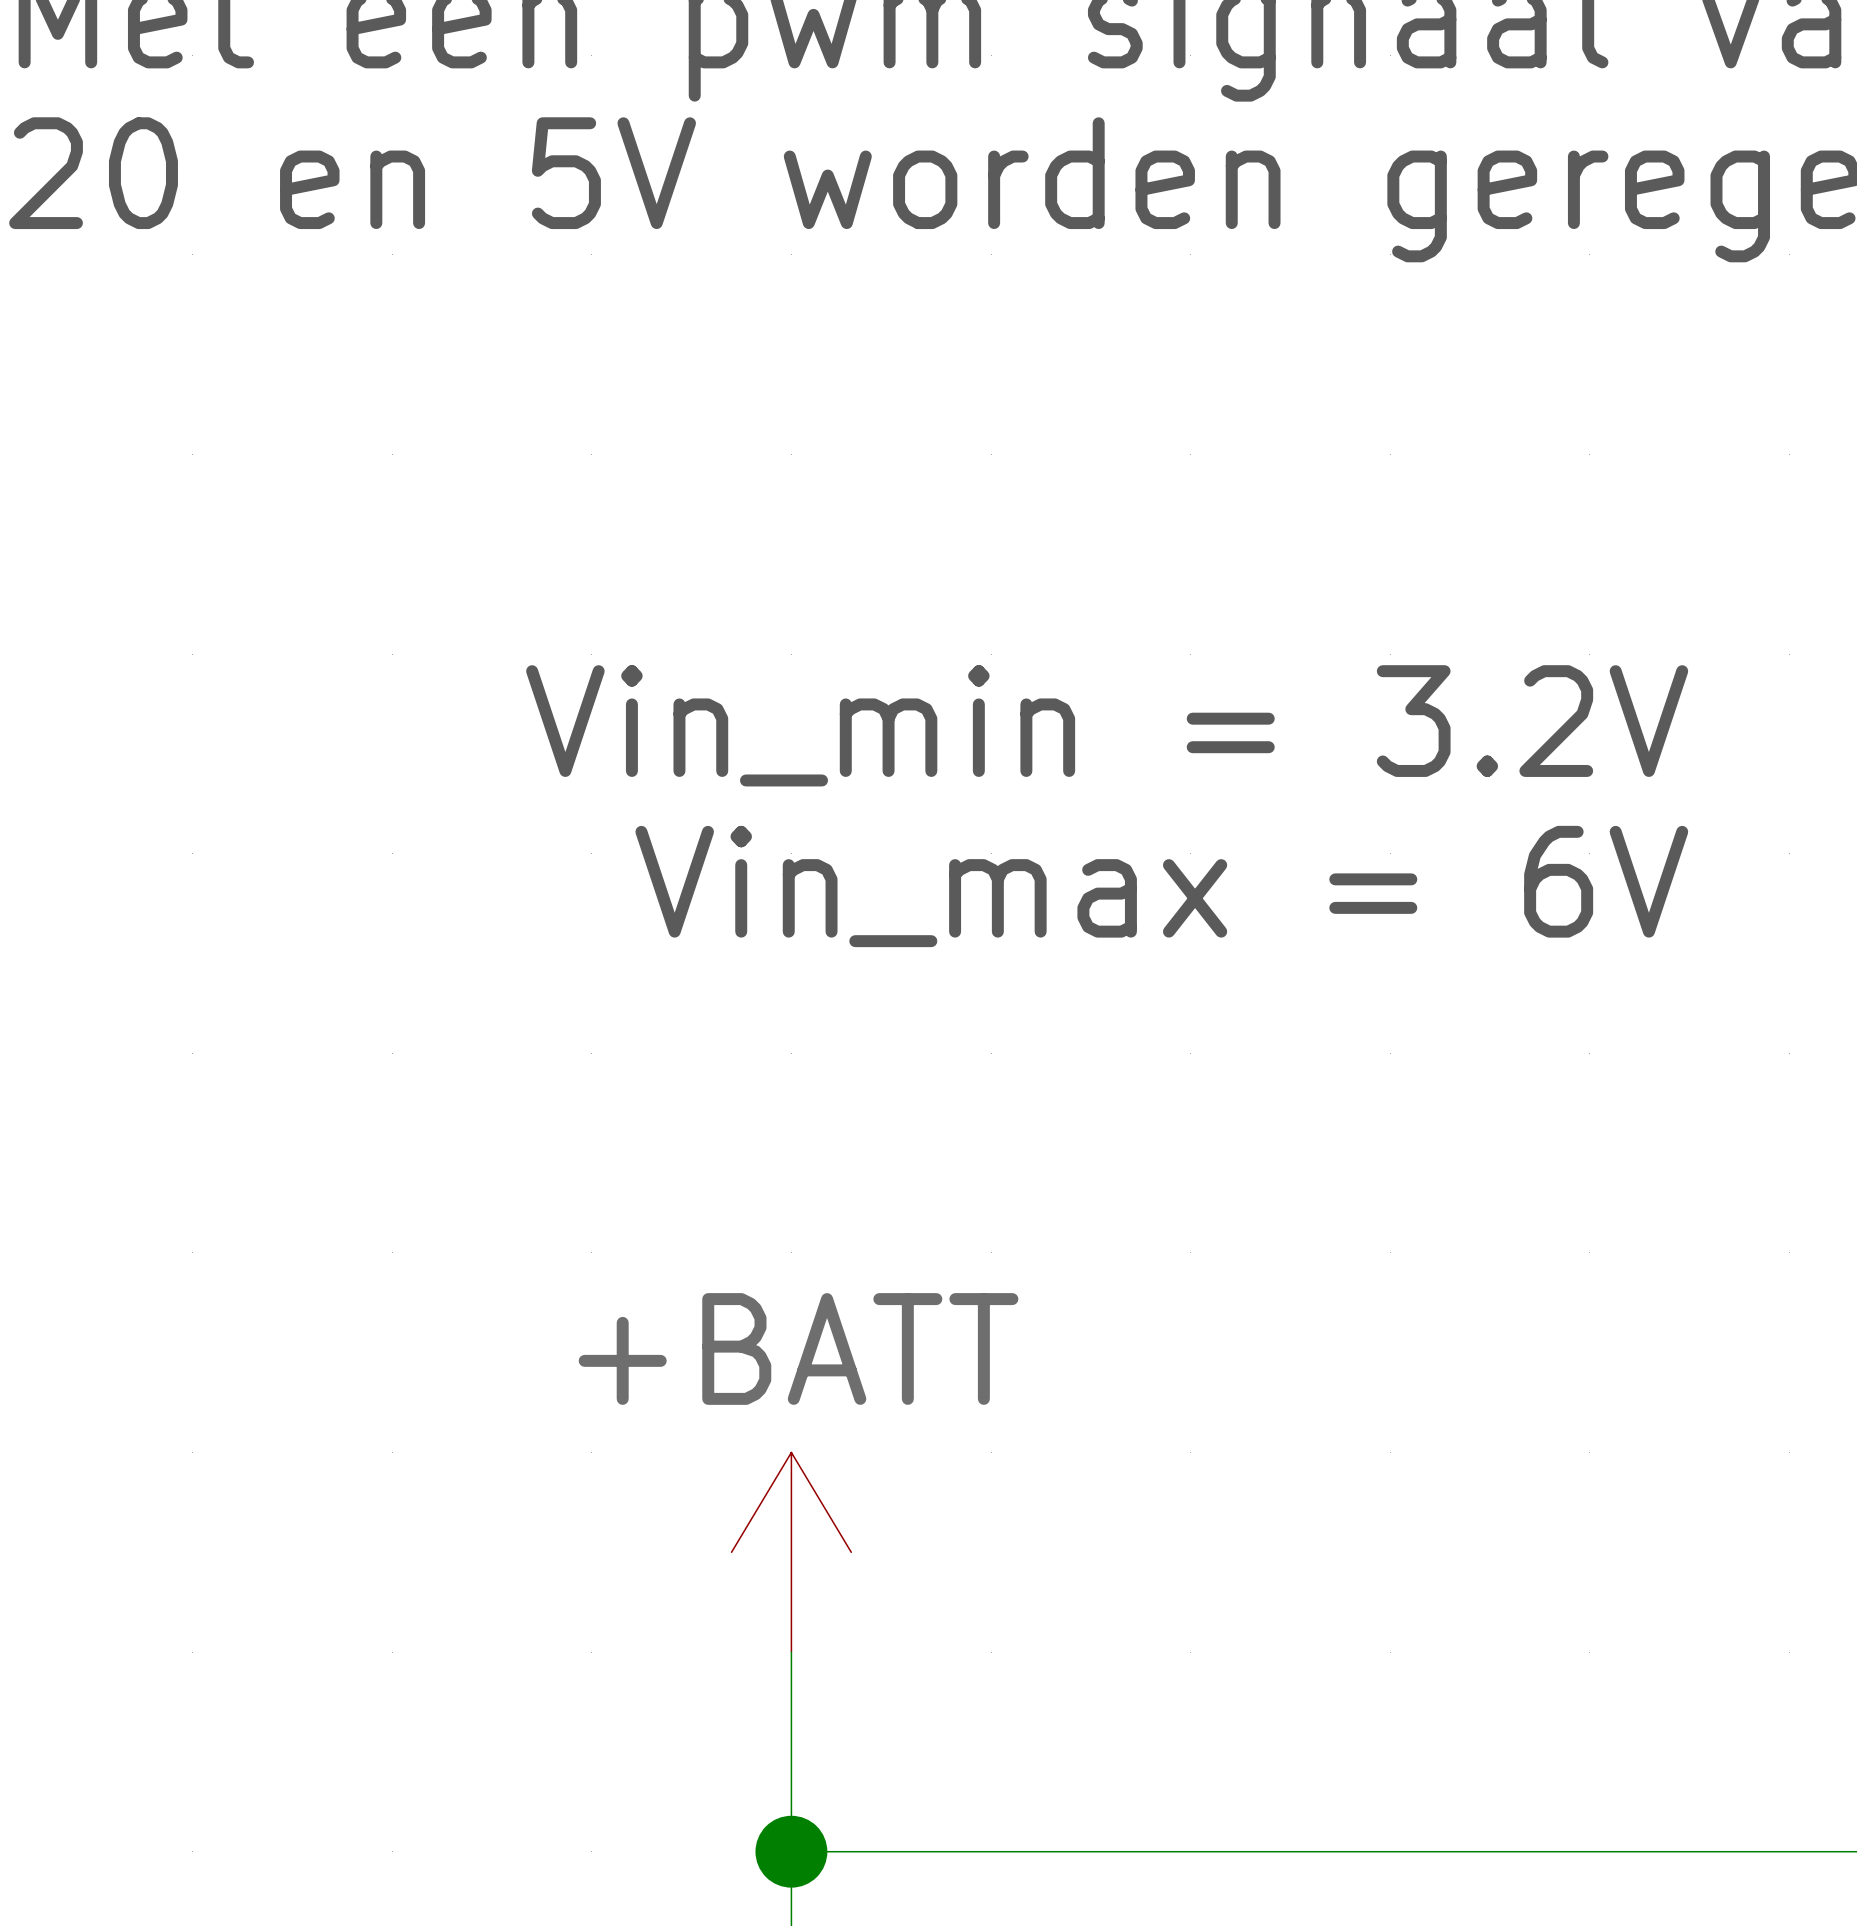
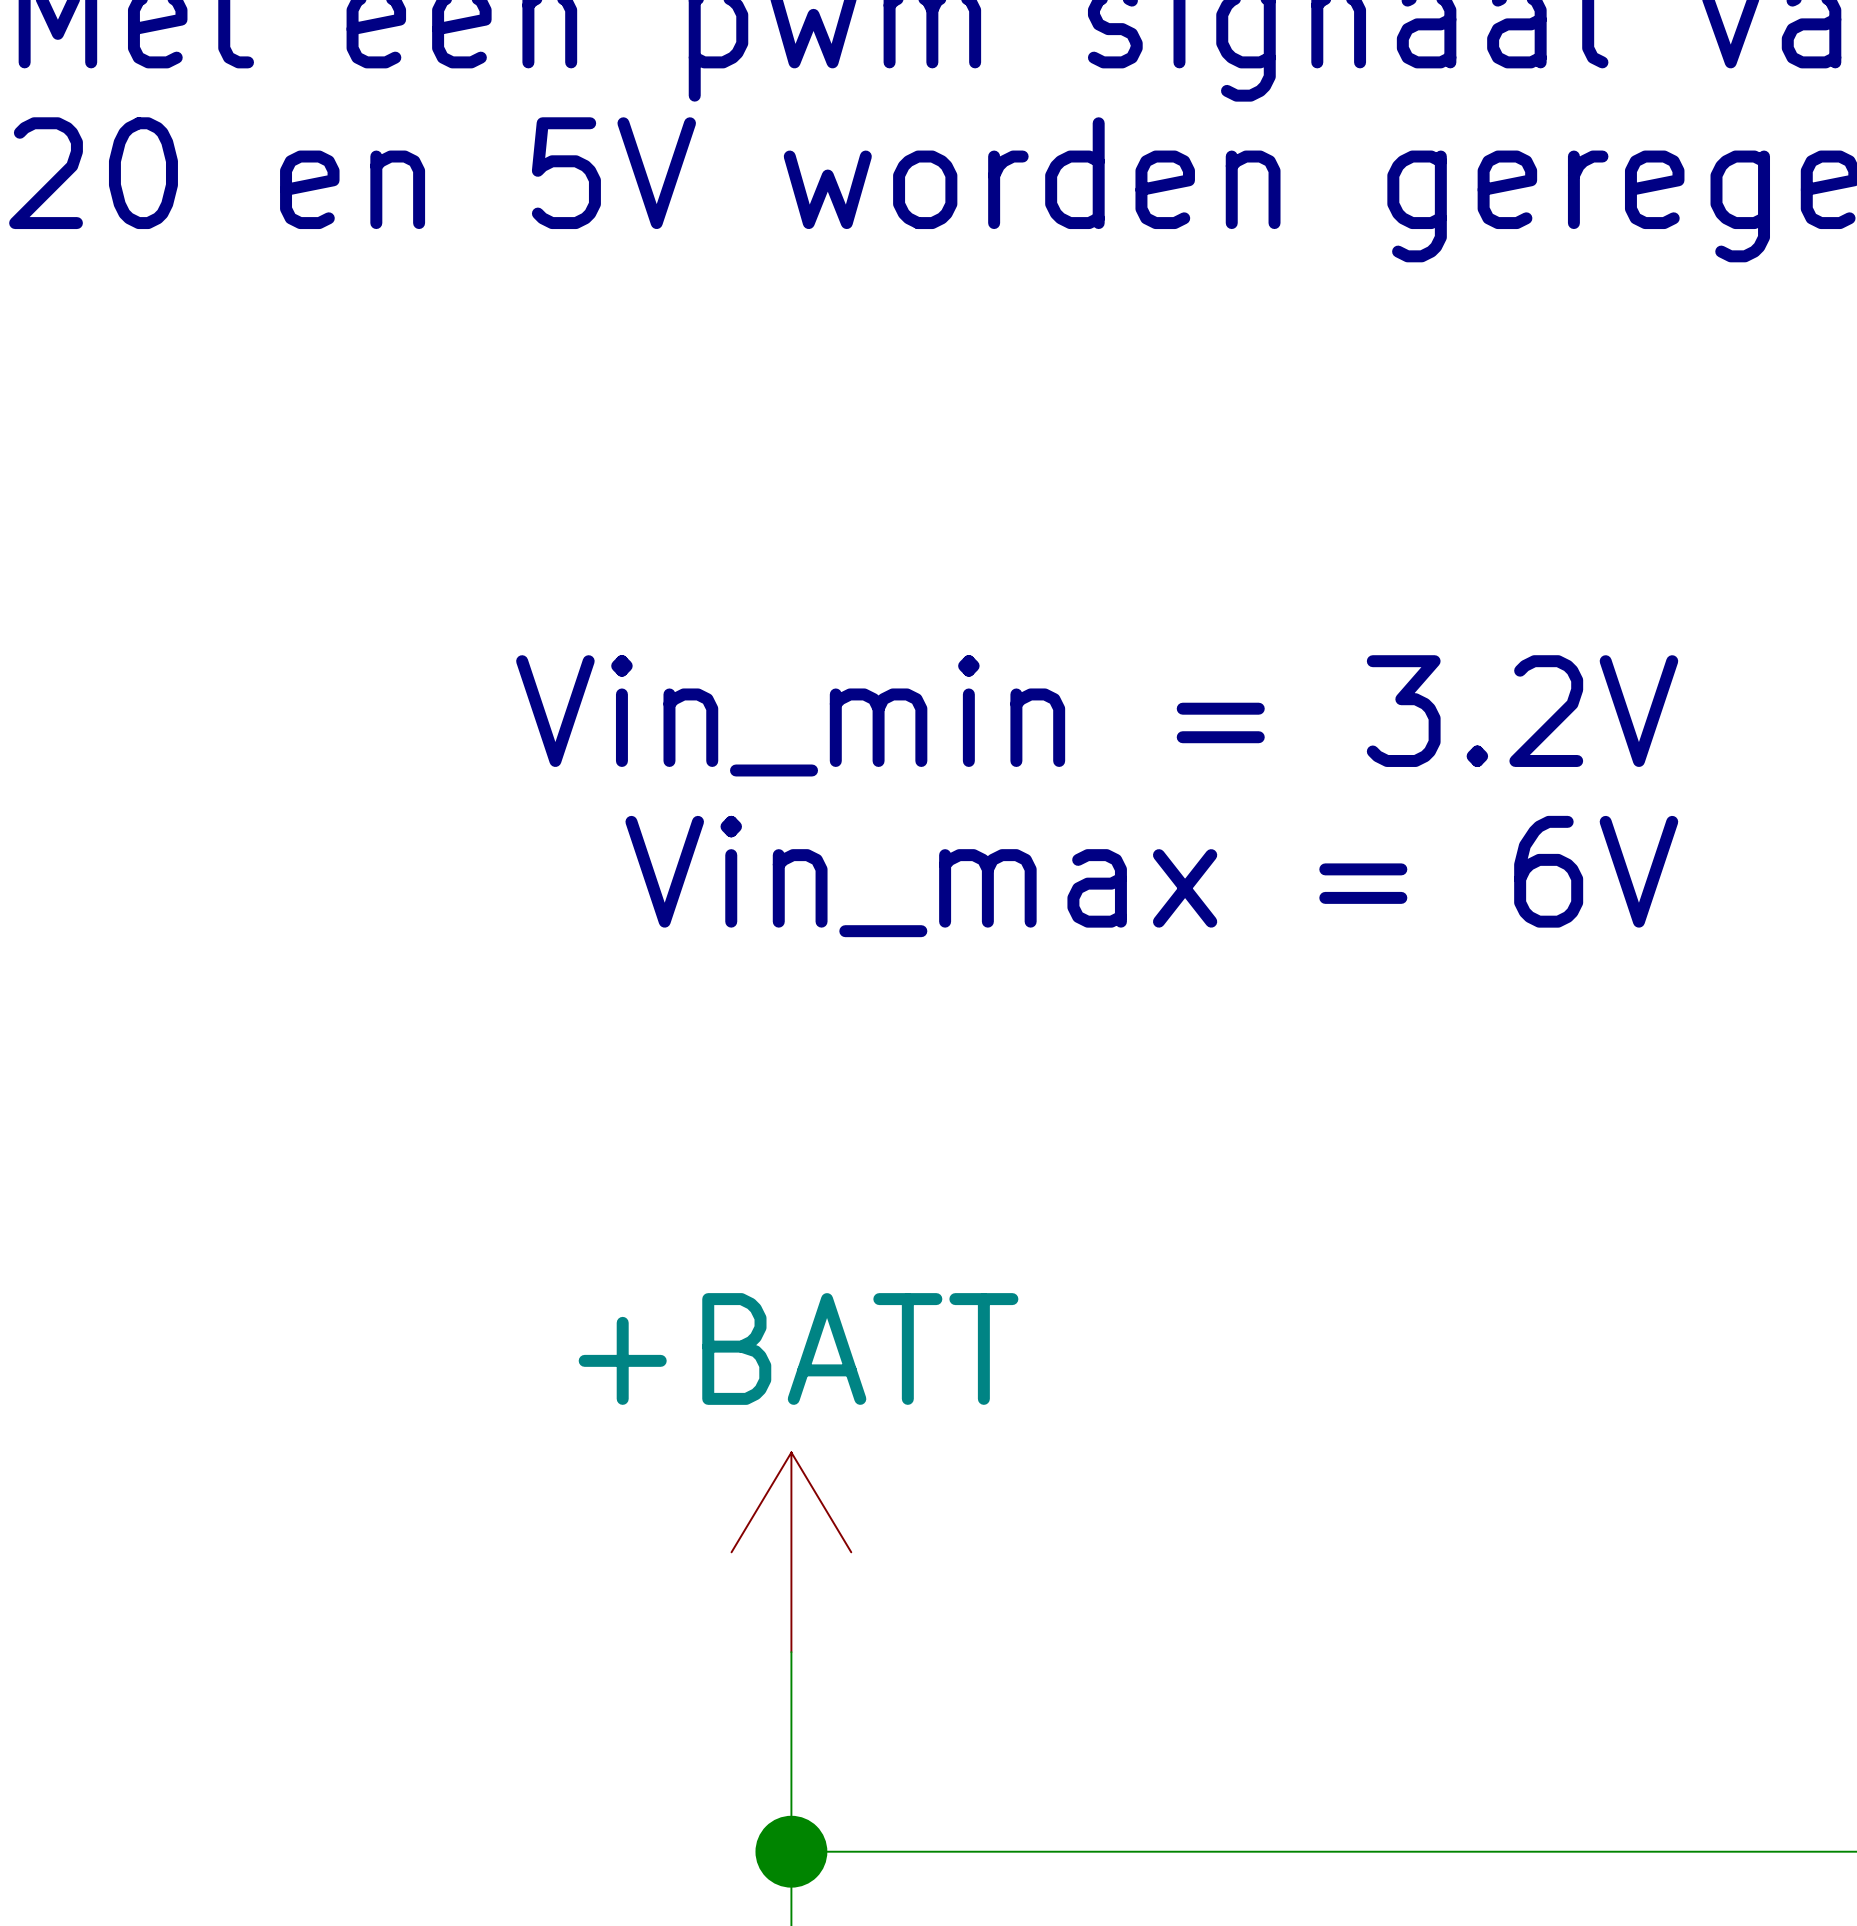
text position: Vin_min = 3.2V (1107, 725) -> Vin_min = 3.2V (1097, 715)
text position: Vin_max = 6V (1161, 886) -> Vin_max = 6V (1151, 876)

